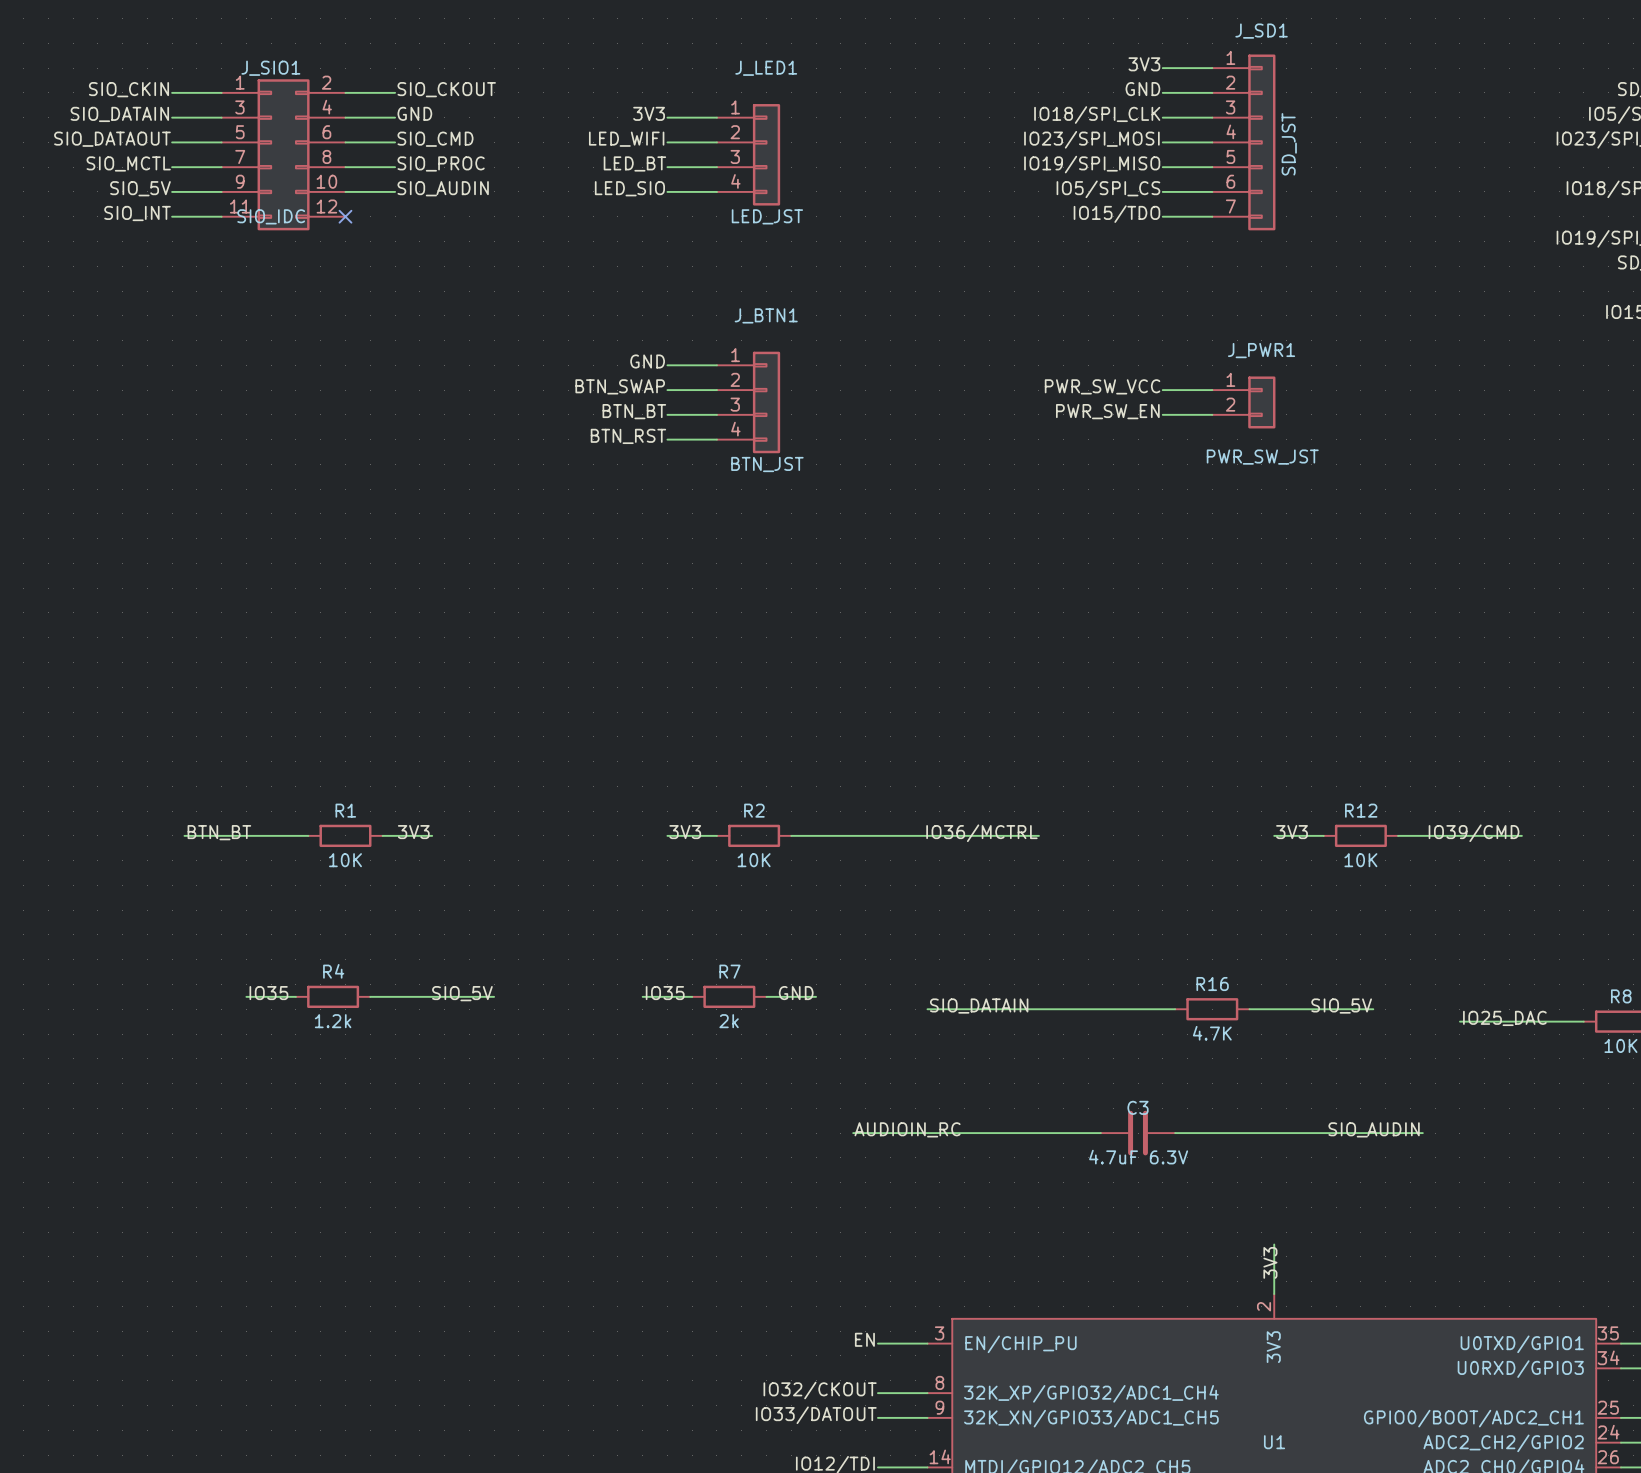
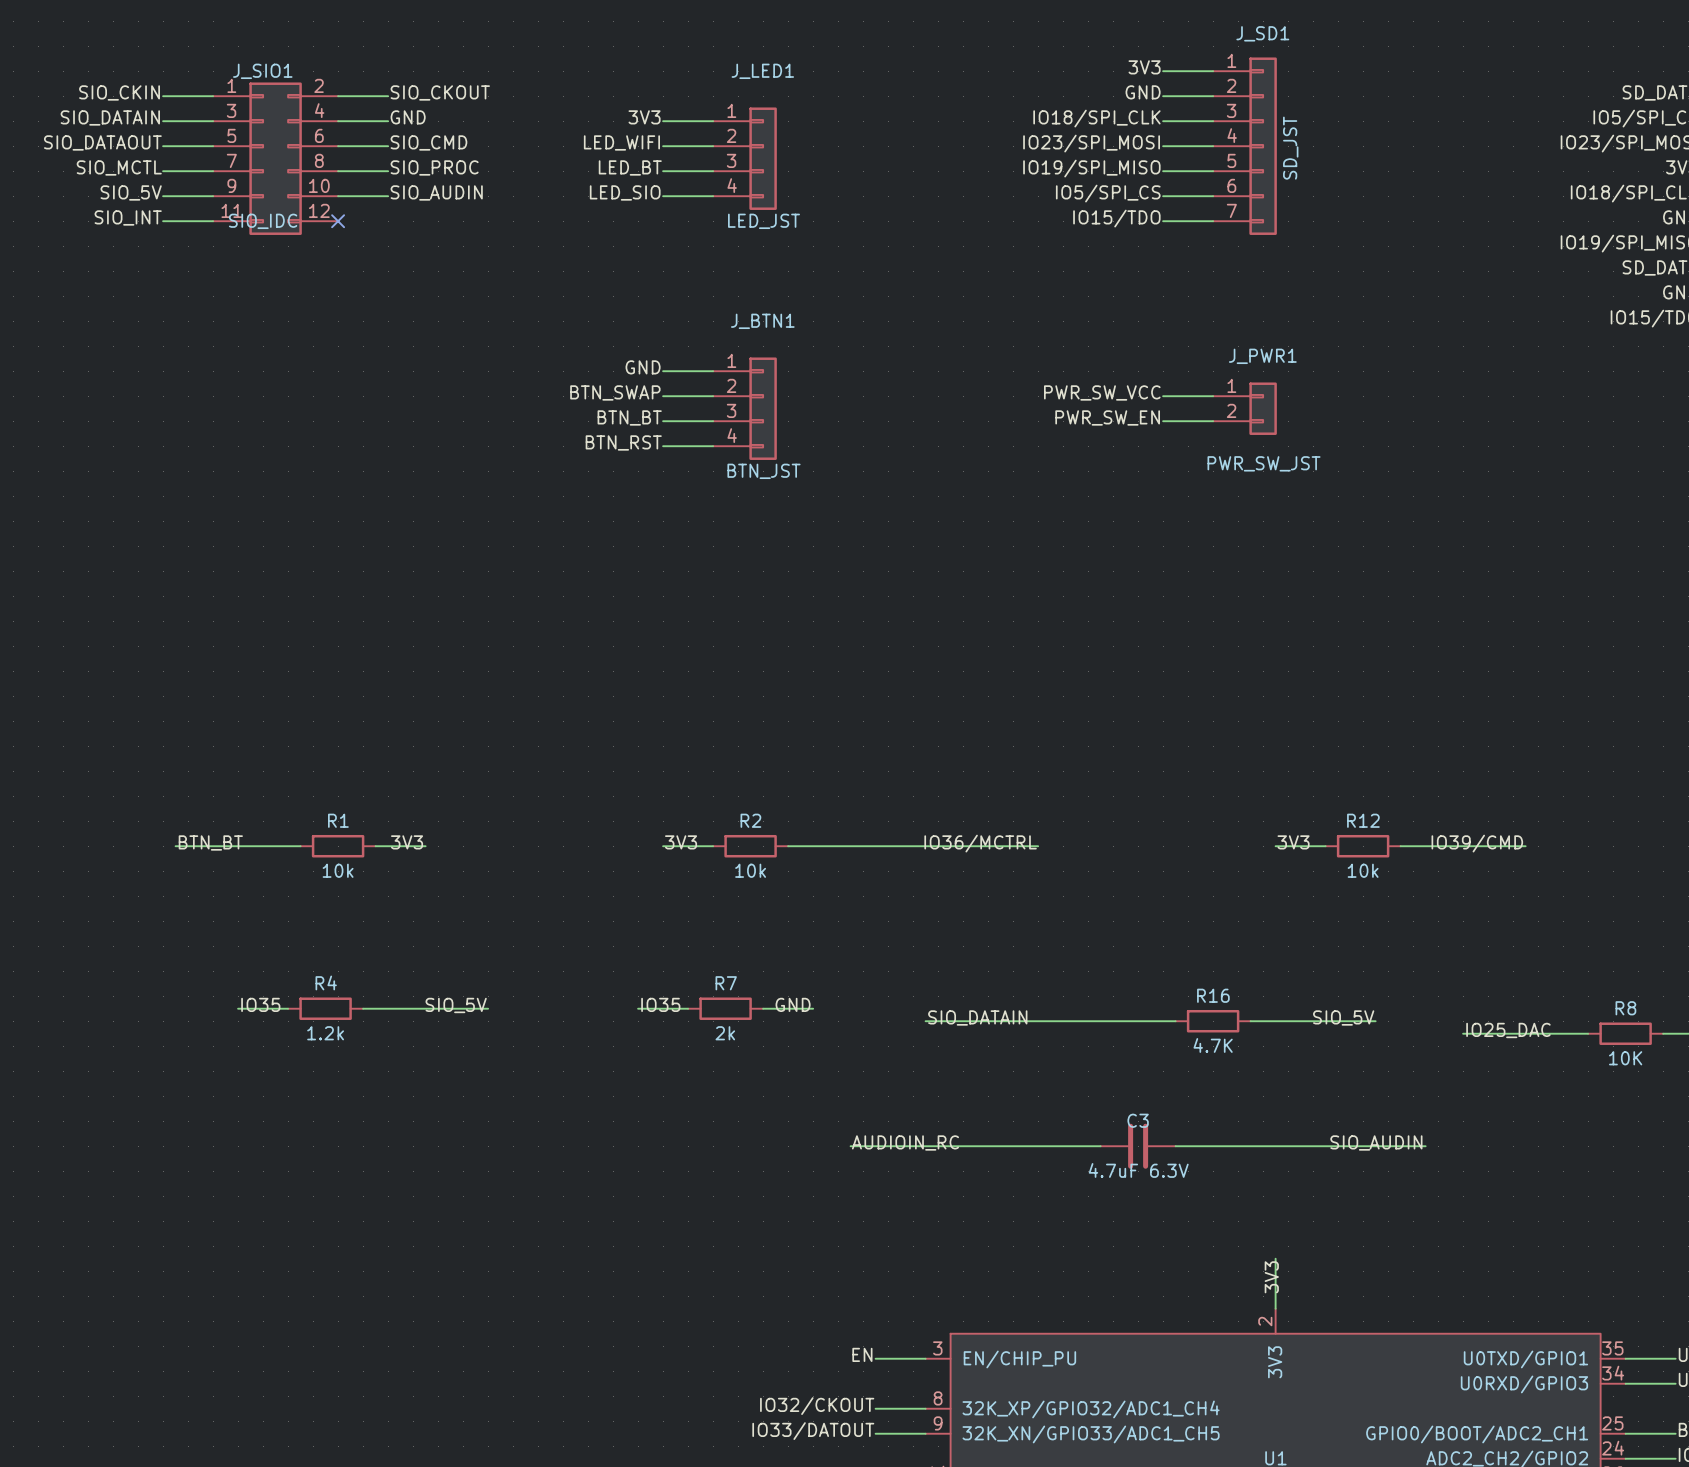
R1 value: 10K (345, 860) -> 10k (338, 870)
R2 value: 10K (754, 860) -> 10k (750, 870)
R12 value: 10K (1360, 860) -> 10k (1363, 870)

